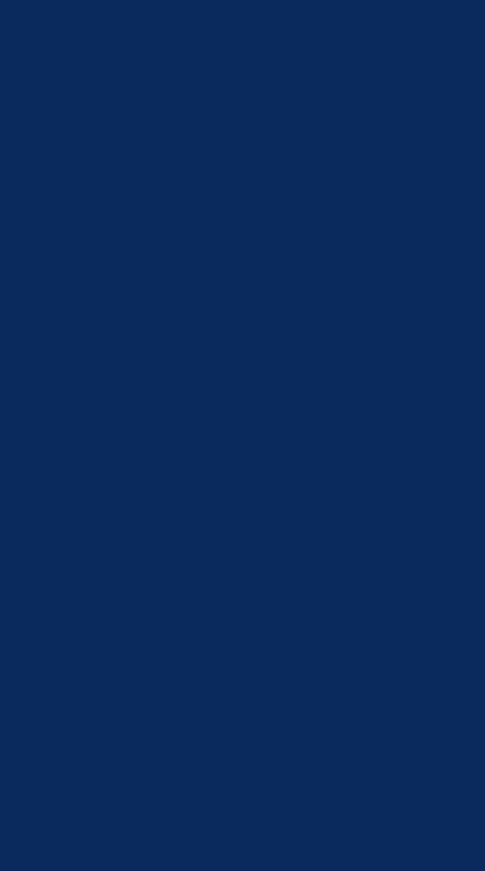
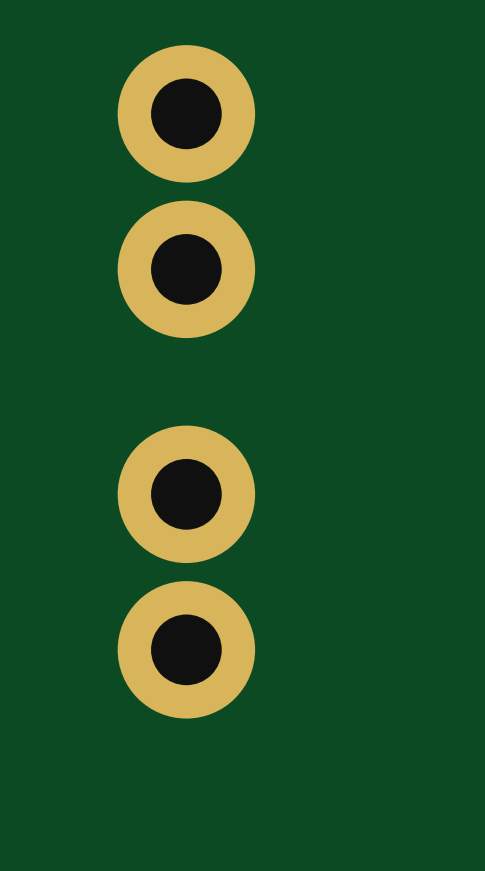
part: none -> (186, 191)
part: none -> (186, 572)

